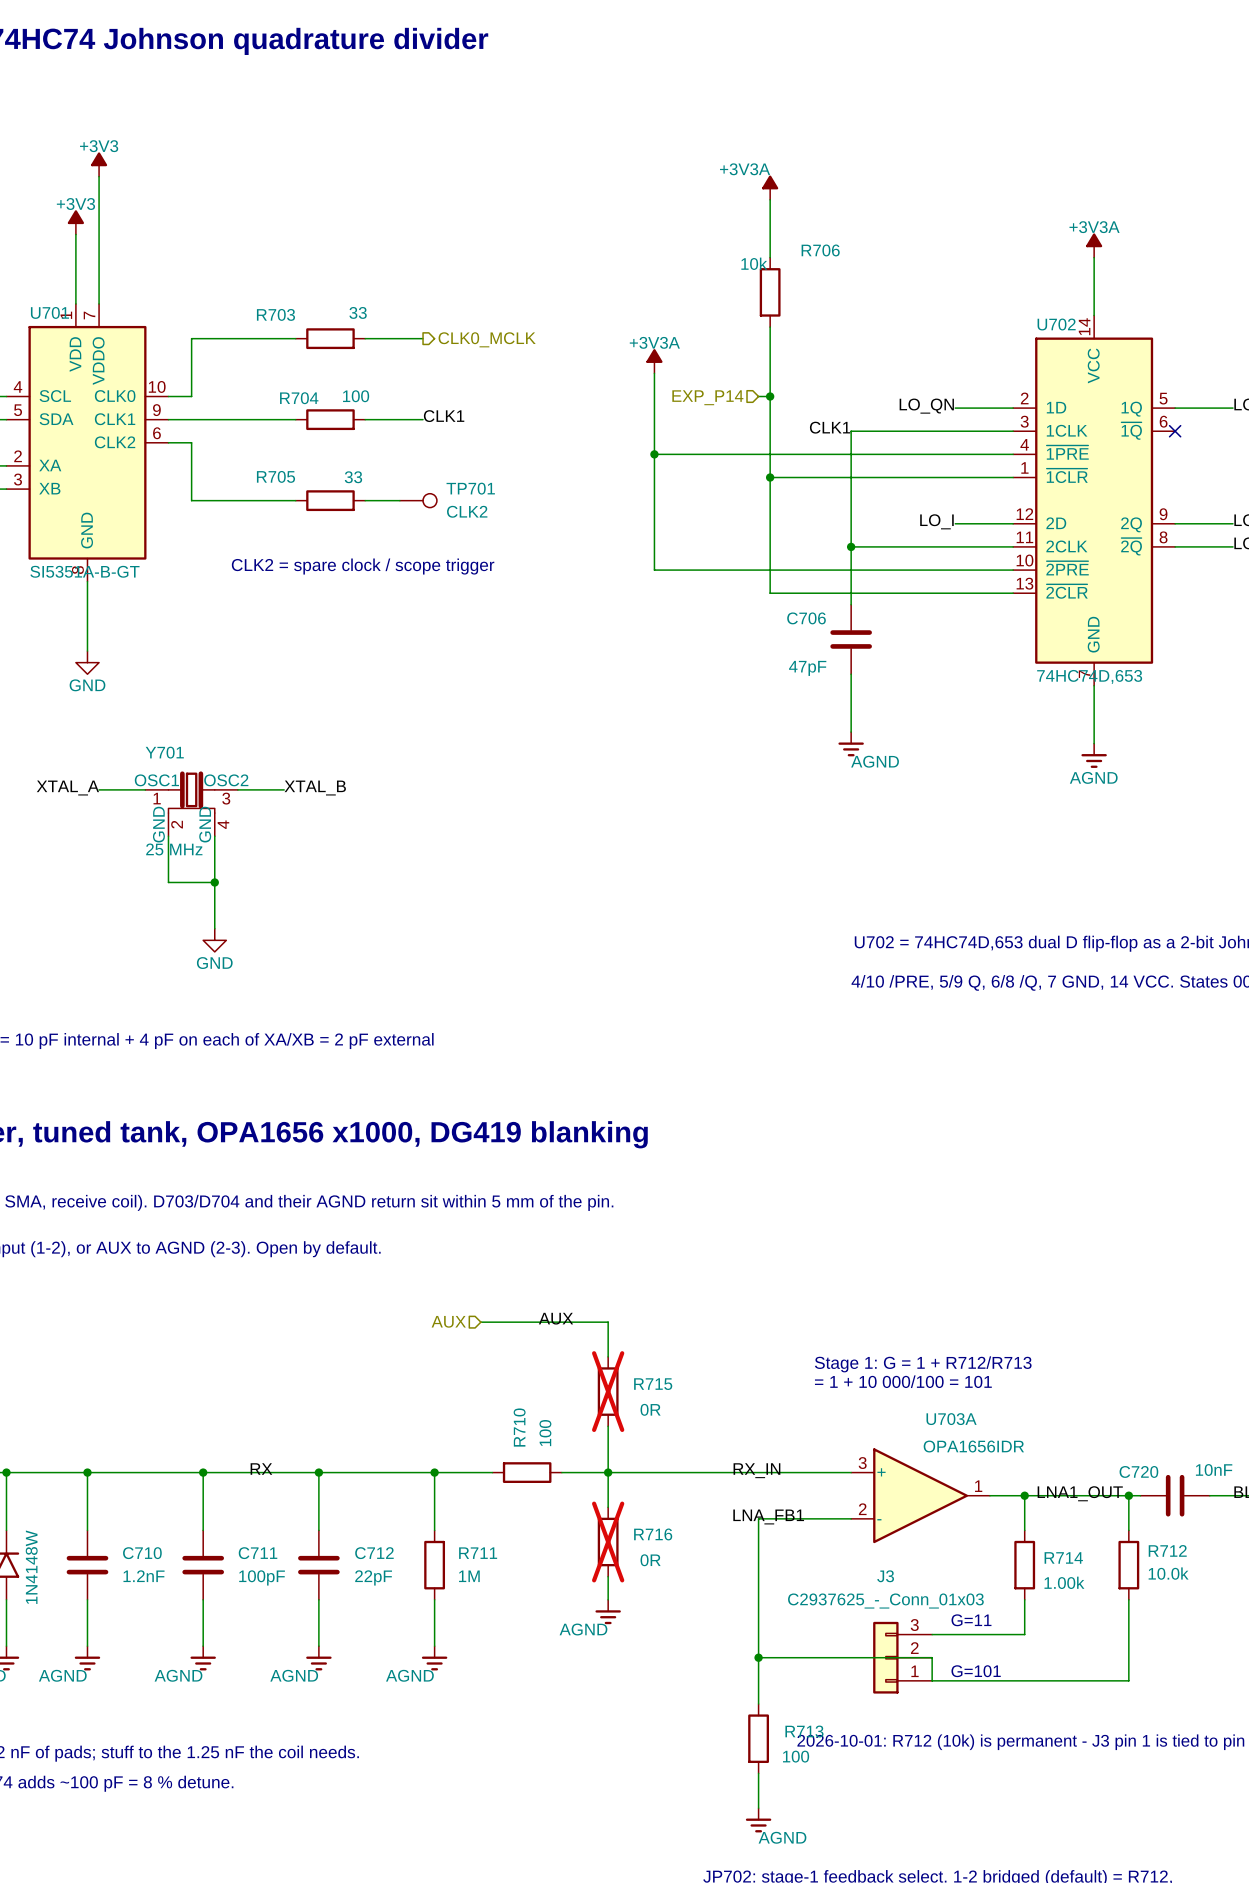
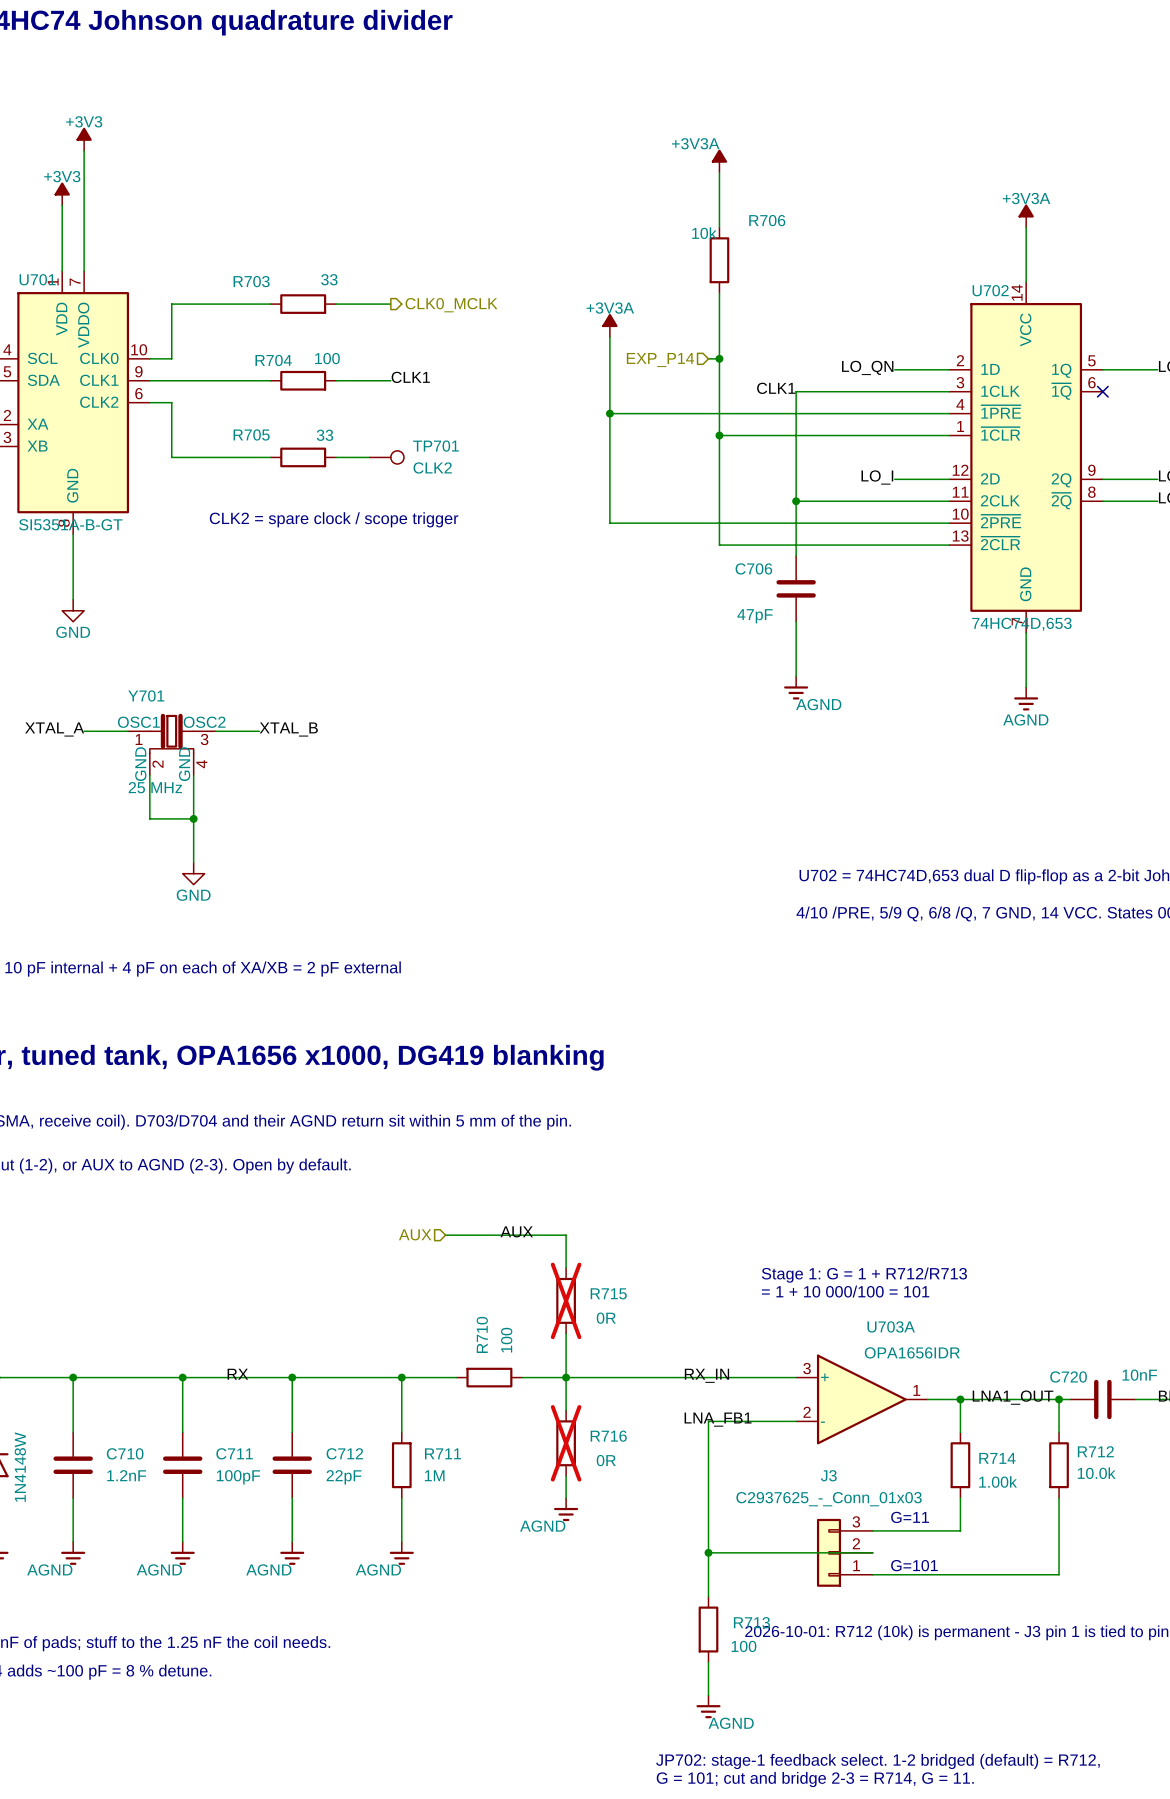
wire: (932, 1657) (932, 1680) -> none

